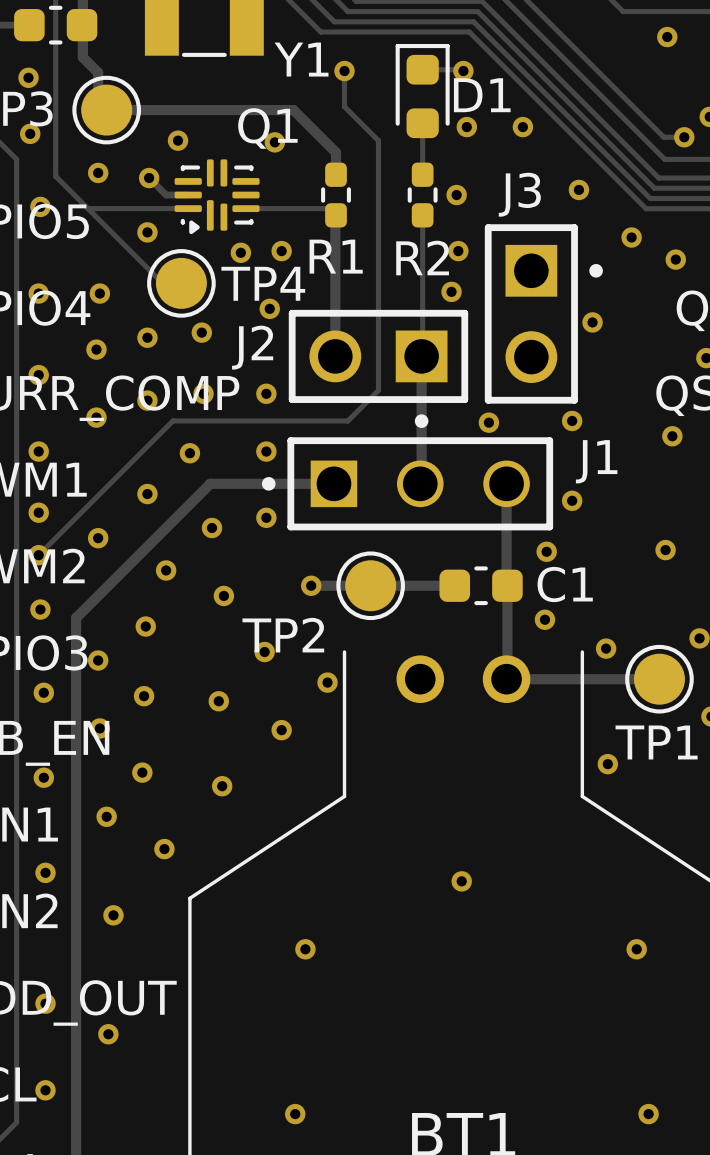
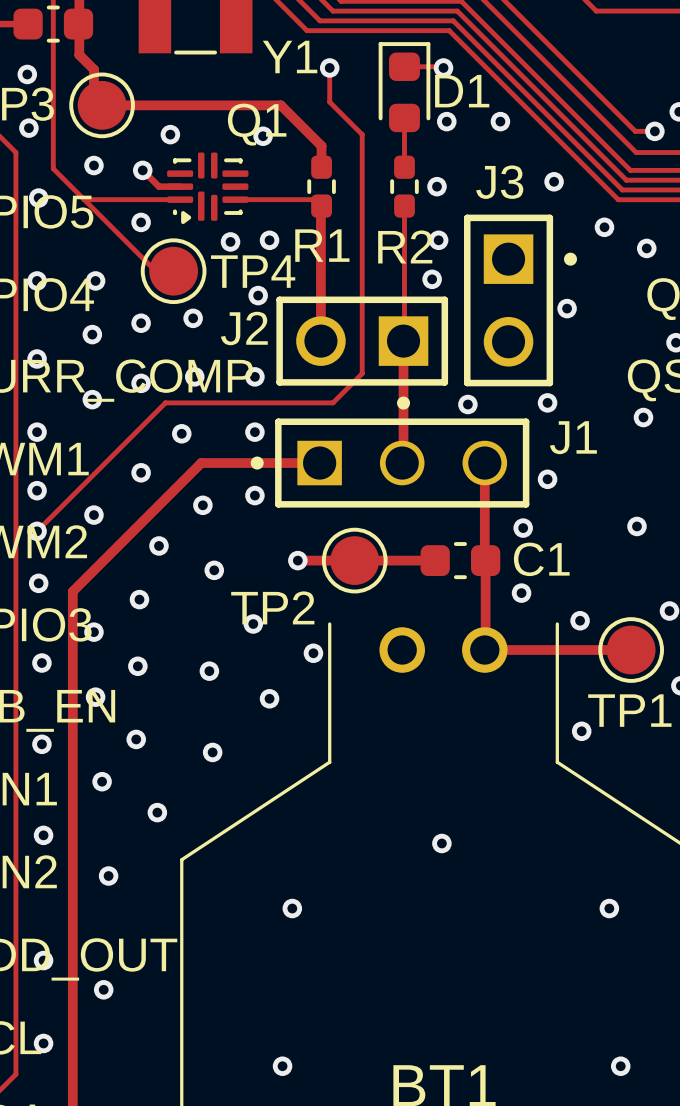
via: (667, 37) -> none

